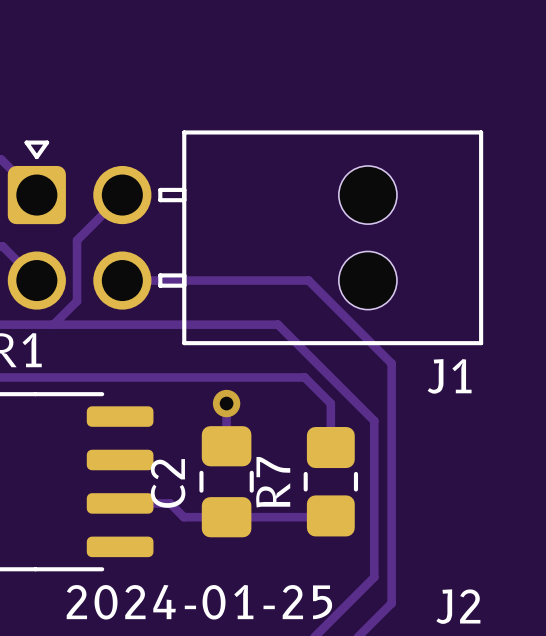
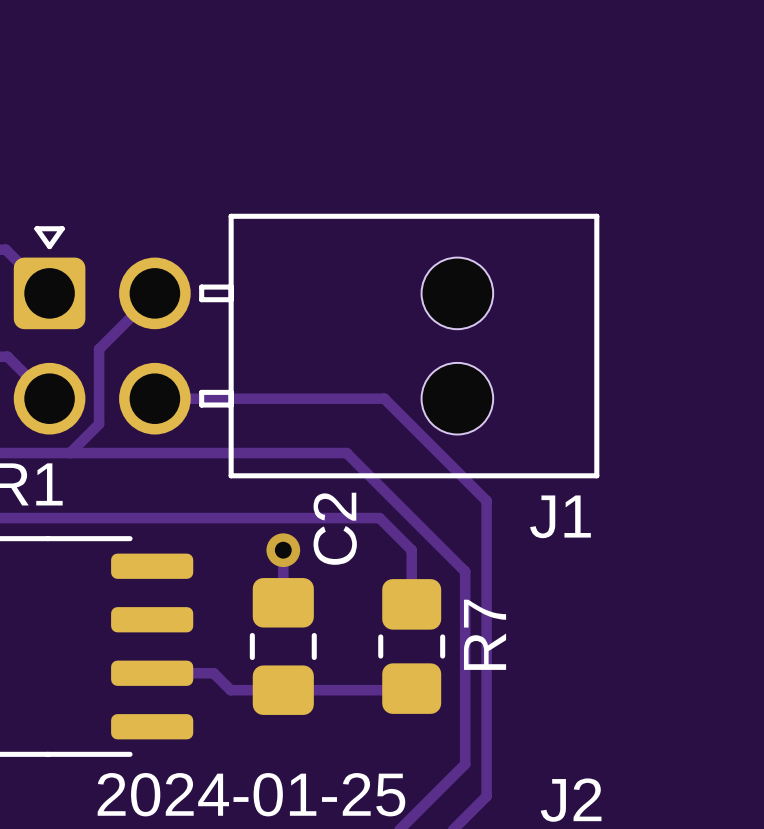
R7 name position: R7 (273, 482) -> R7 (485, 634)
C2 name position: C2 (168, 483) -> C2 (335, 528)

